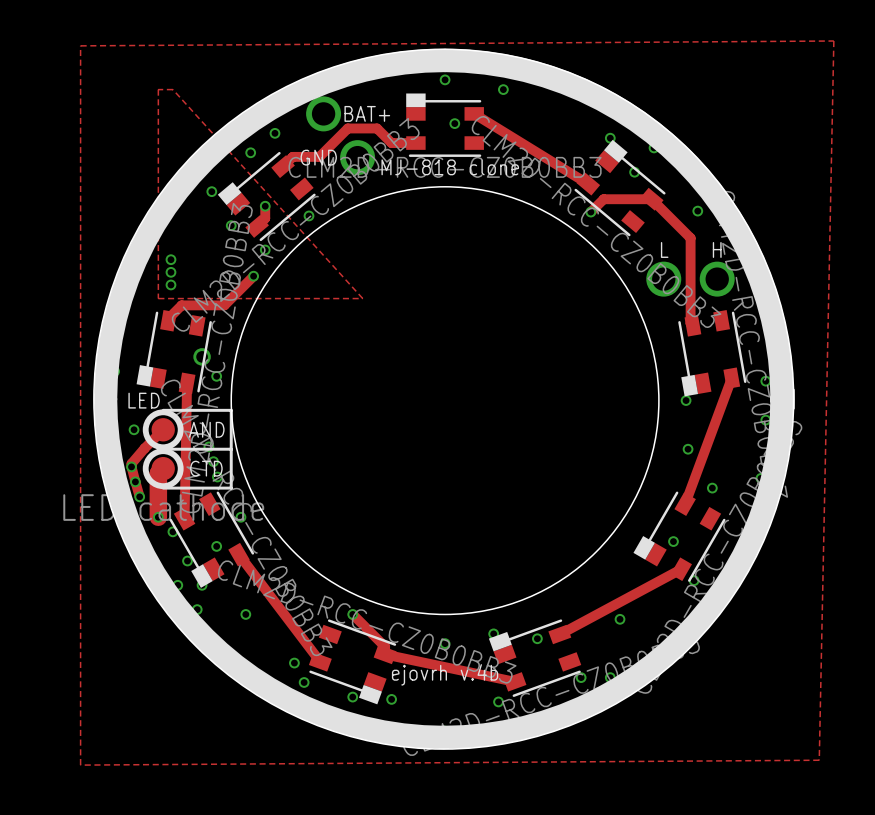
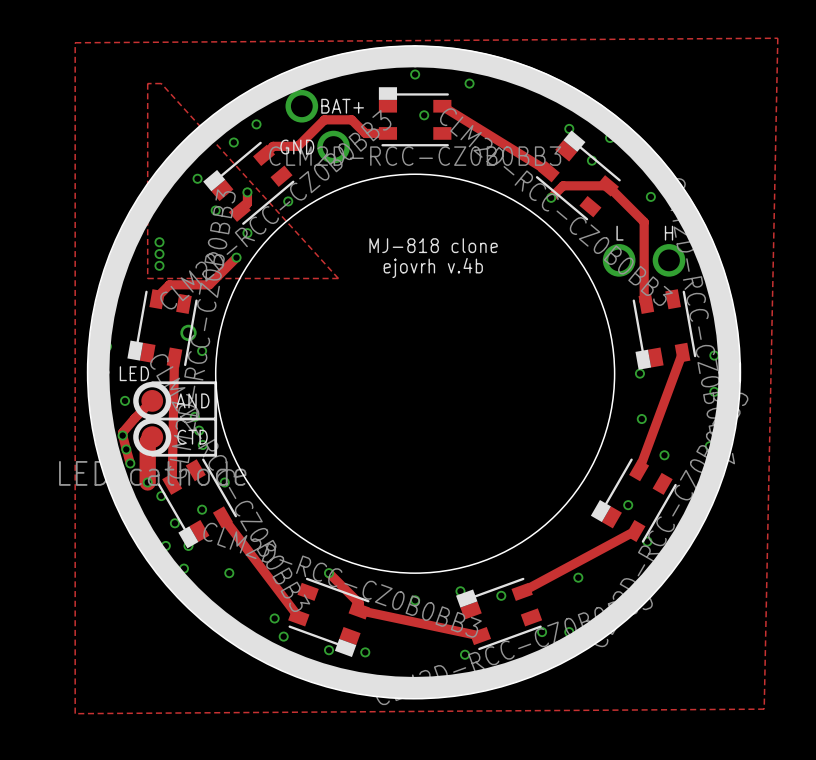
text position: MJ-818 clone (450, 167) -> MJ-818 clone (433, 245)
text position: ejovrh v.4b (445, 674) -> ejovrh v.4b (433, 267)

